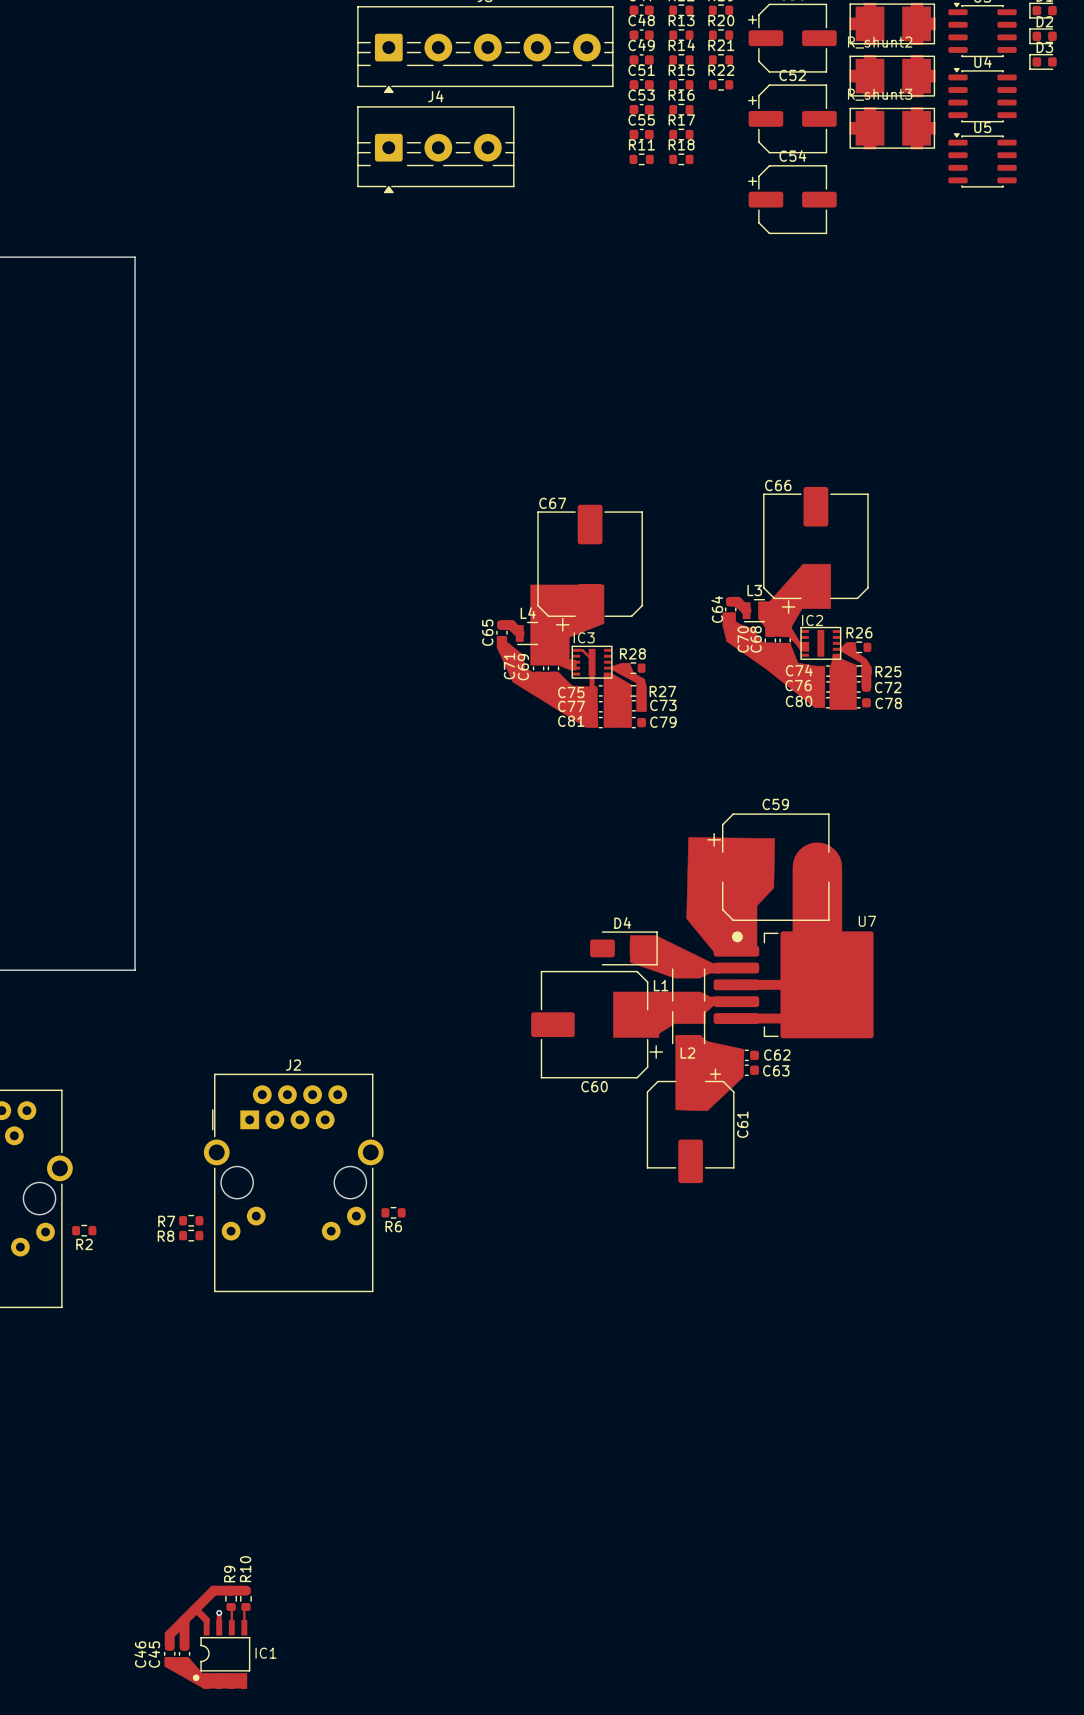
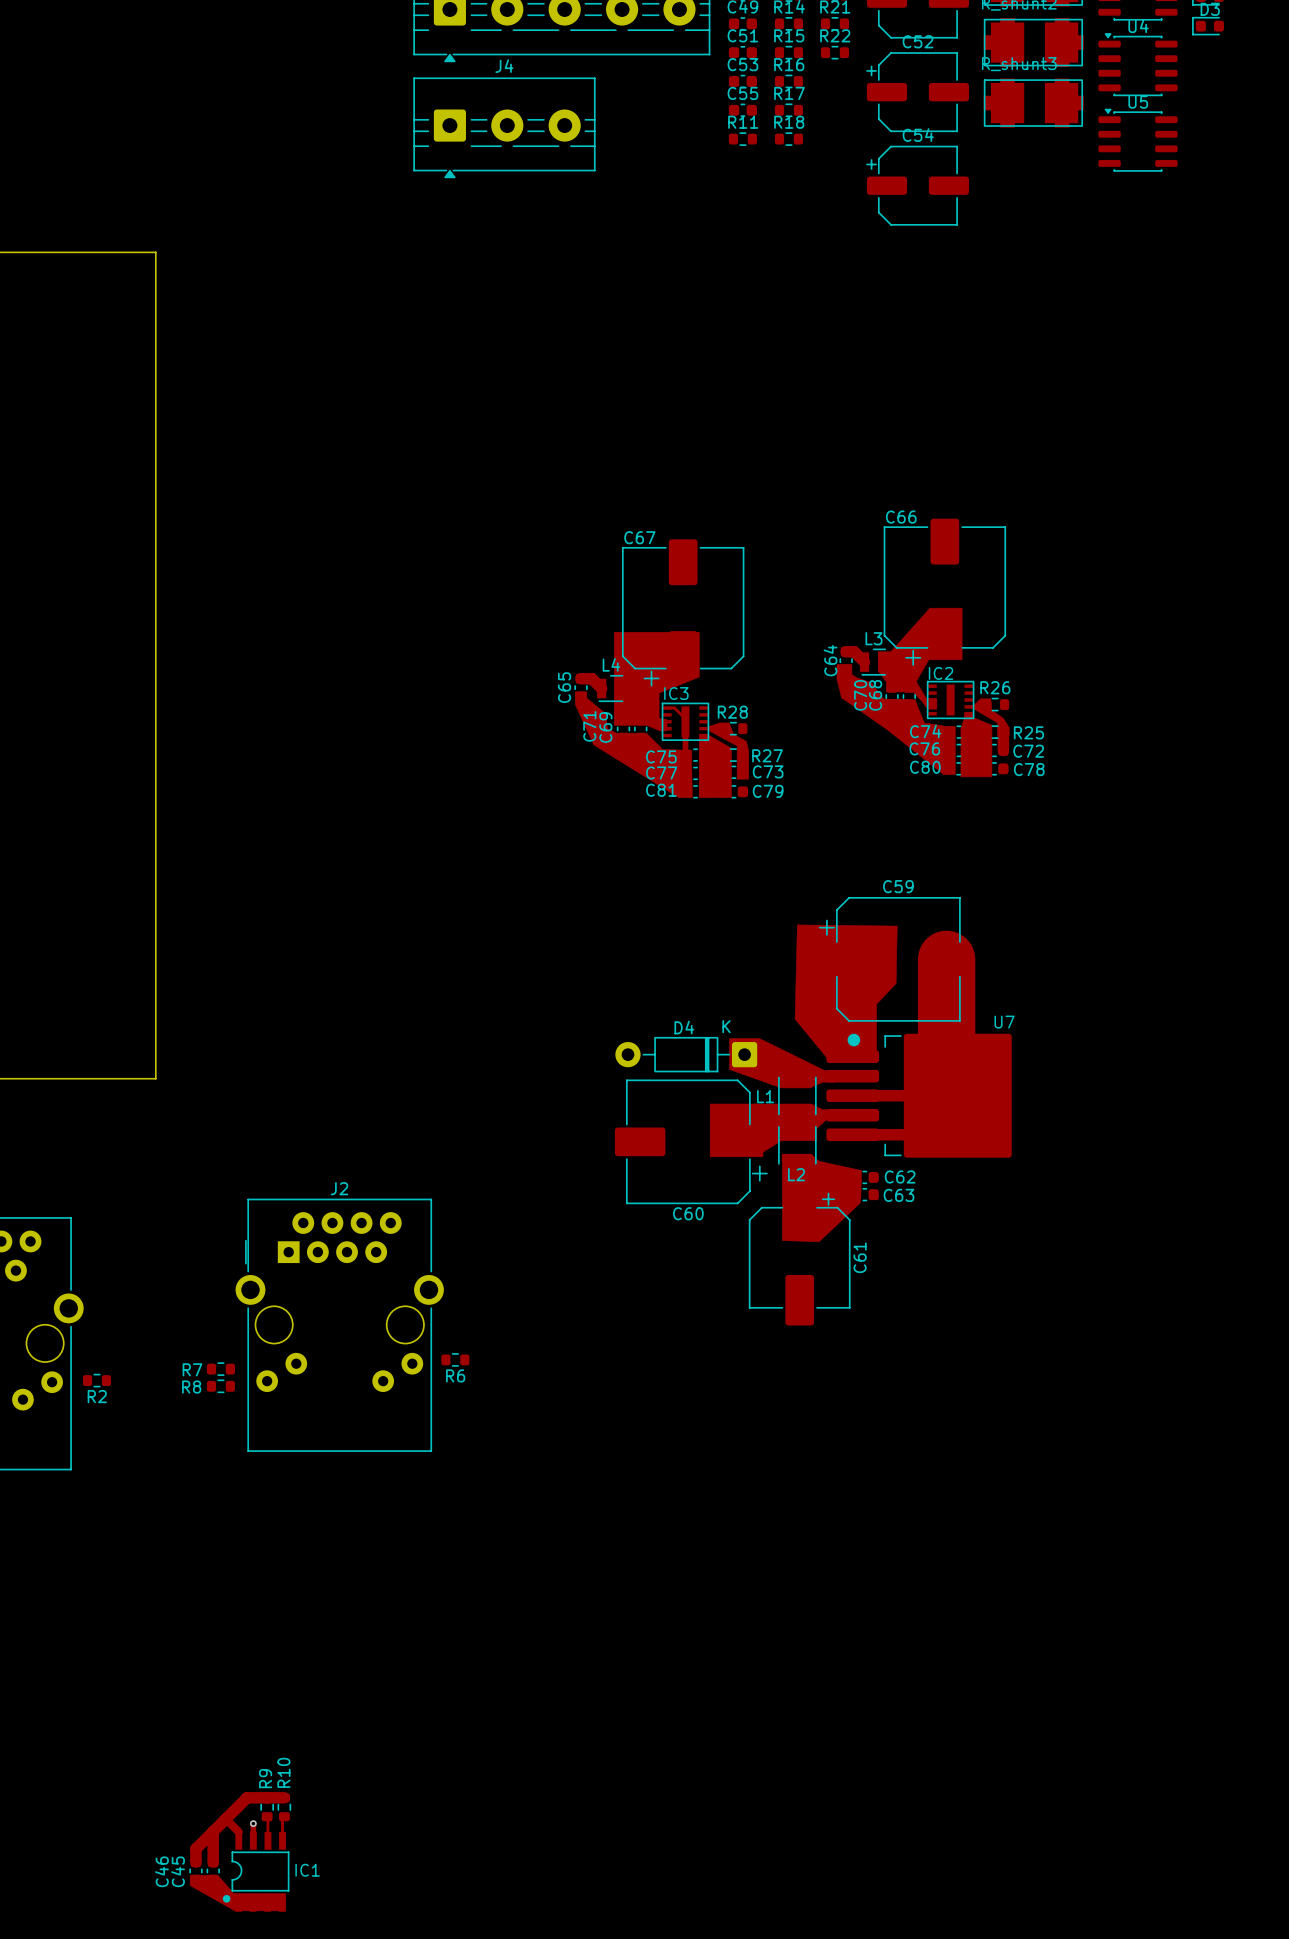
D4 footprint: [590, 931, 658, 966] -> [615, 1037, 758, 1073]

